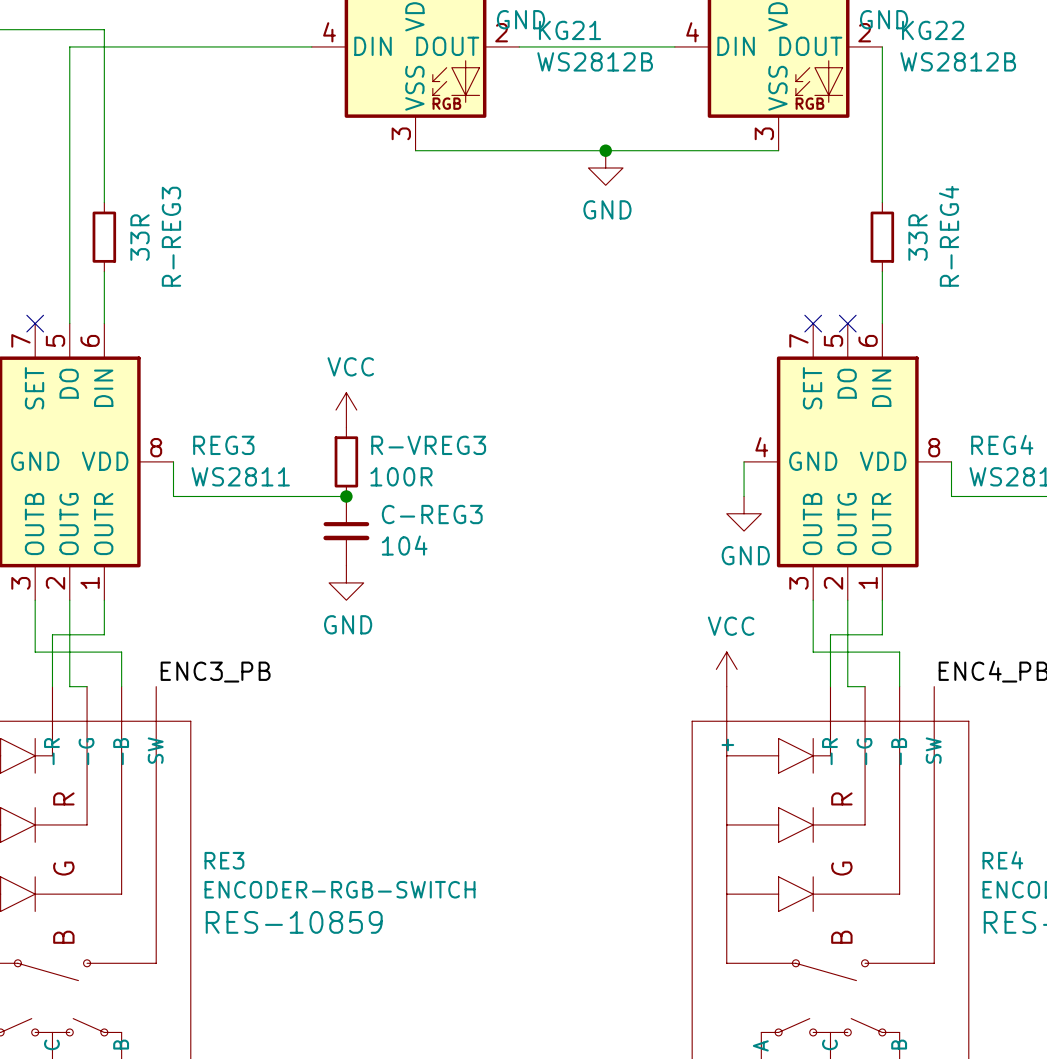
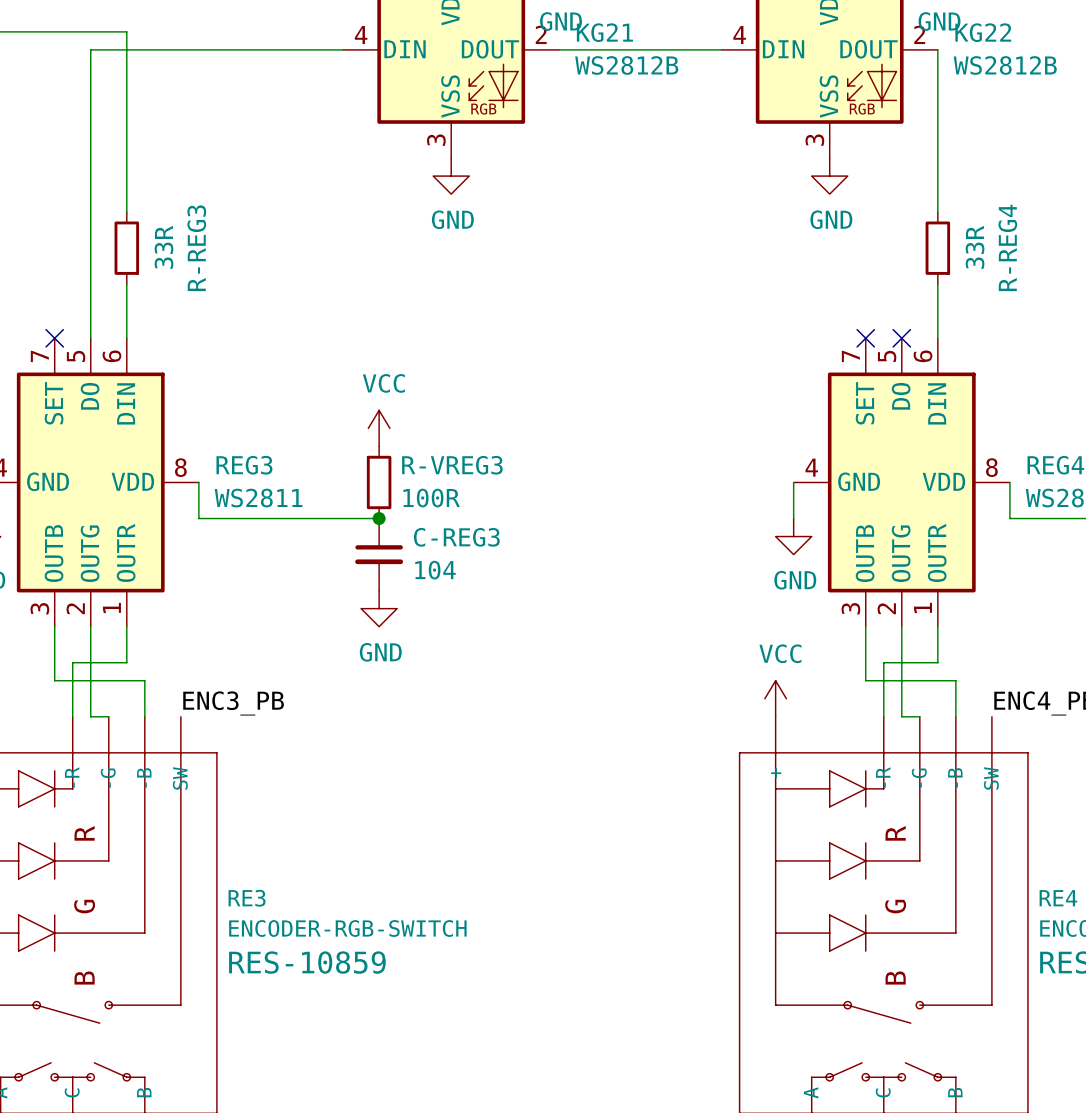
wire: (415, 150) (778, 150) -> none
junction: (605, 150) -> none
power symbol: none -> GND (451, 176)
power symbol: GND (605, 167) -> none
power symbol: none -> GND (829, 176)

